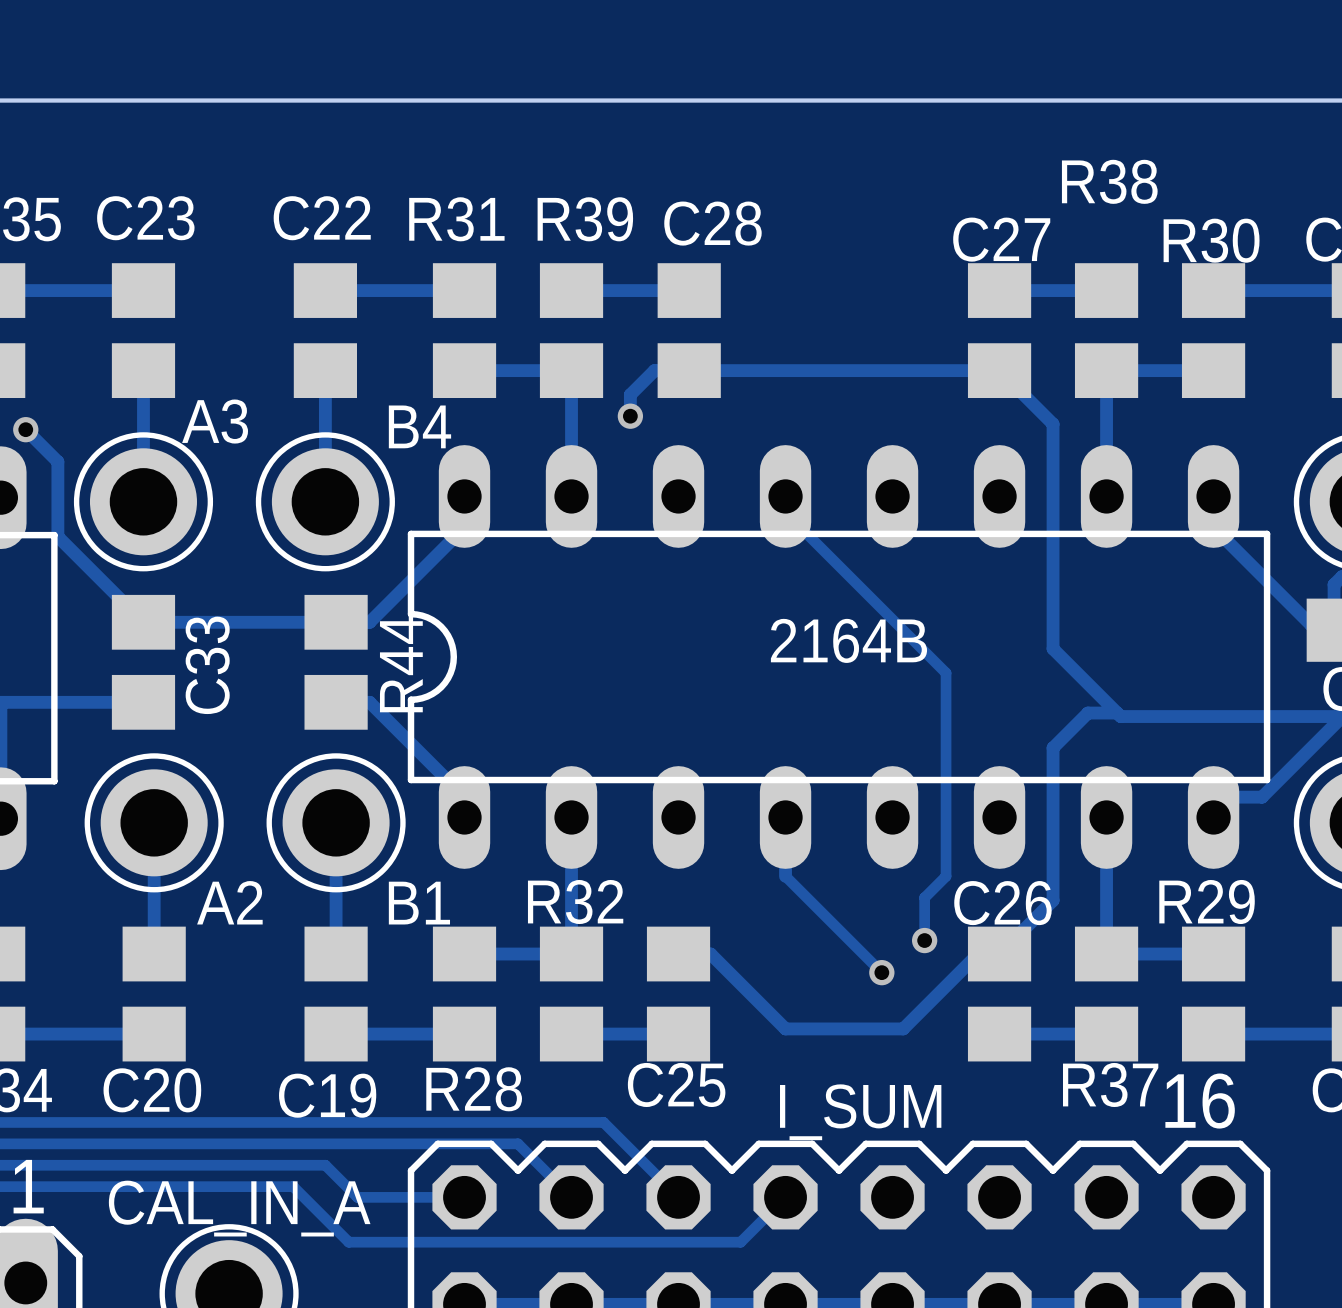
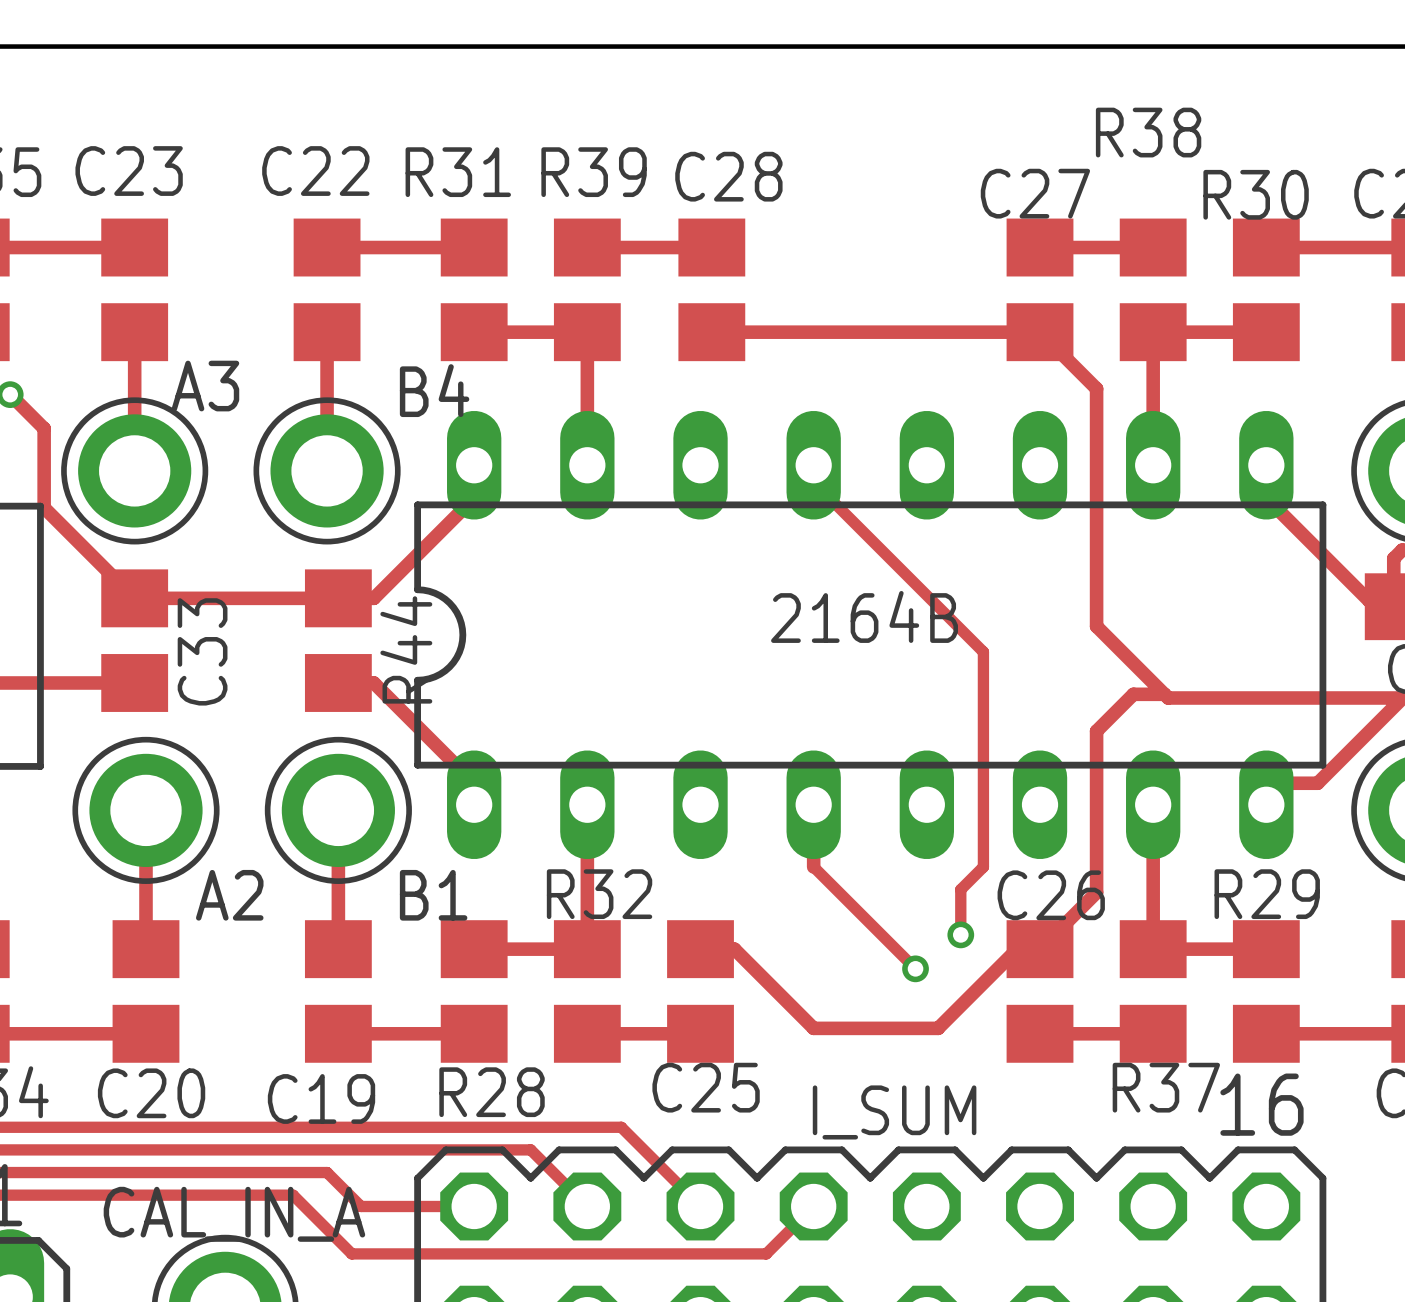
track: (689, 370) (654, 370) (630, 394) (630, 416) -> none
via: (630, 416) -> none

